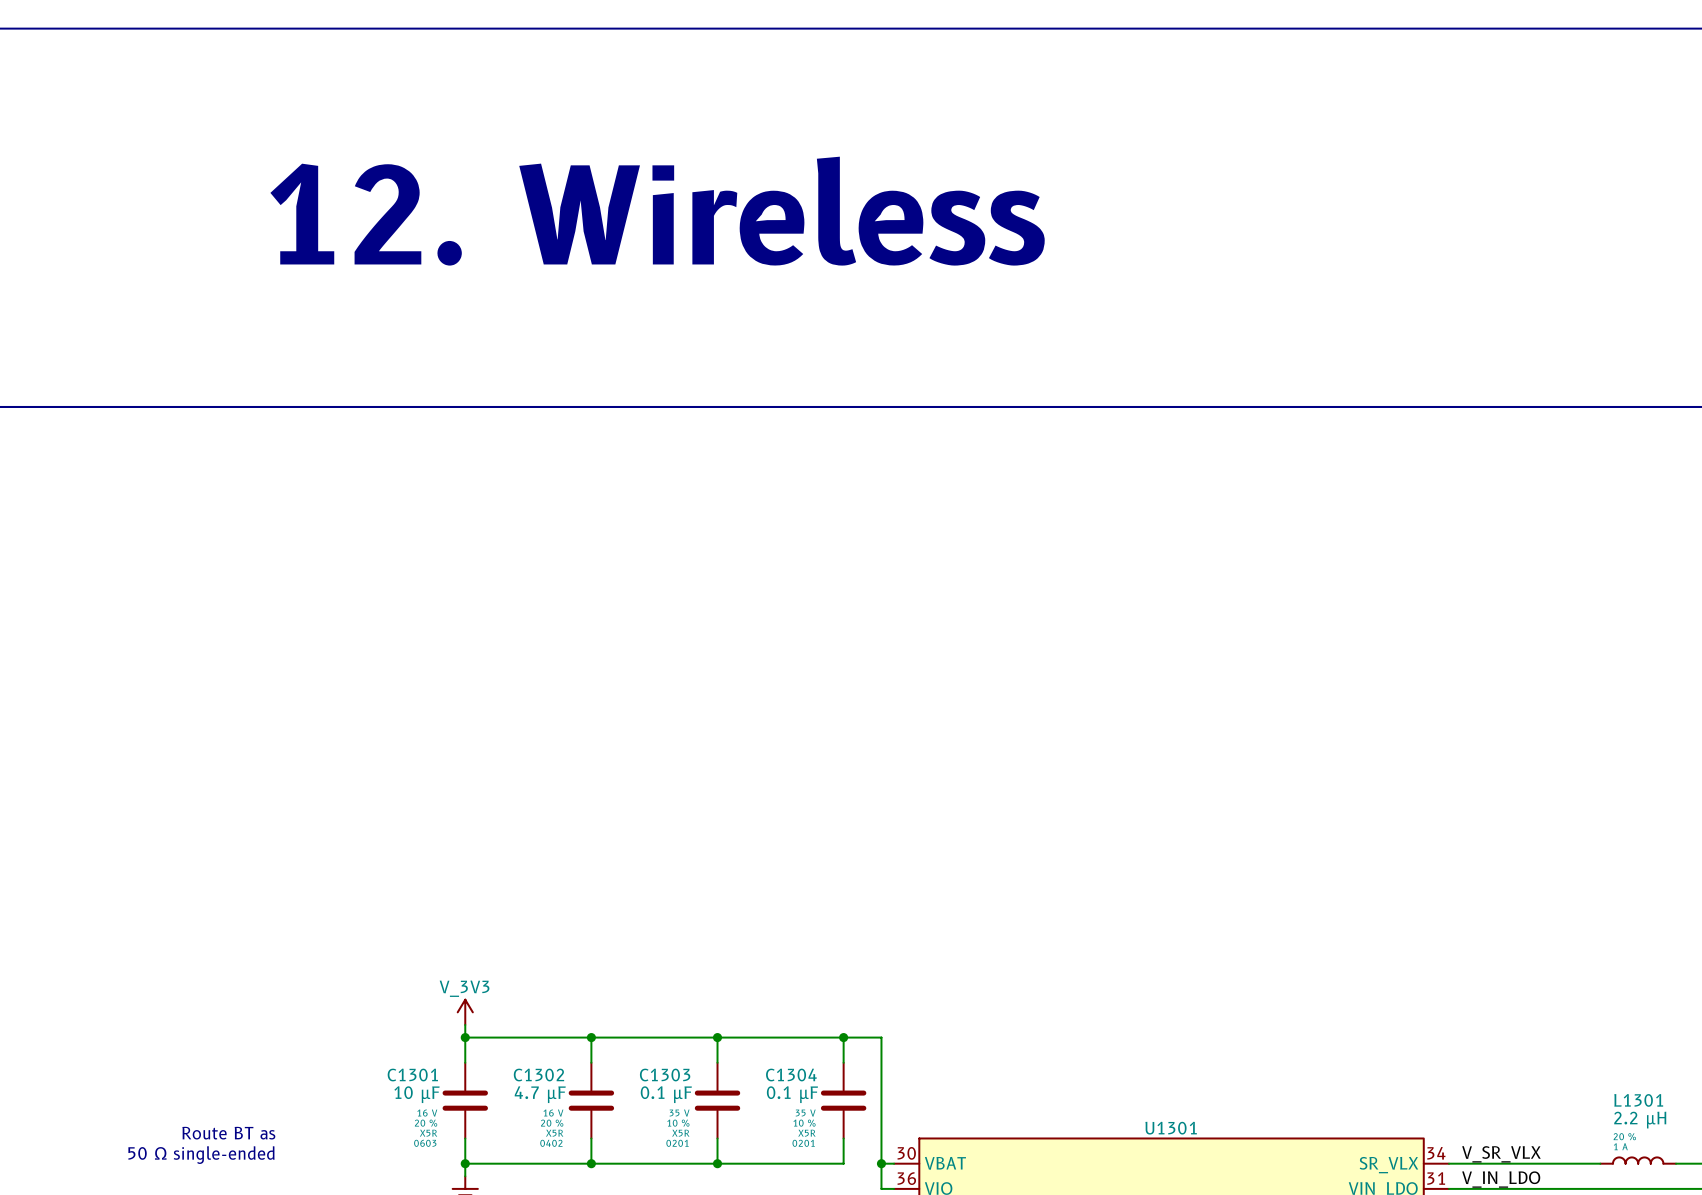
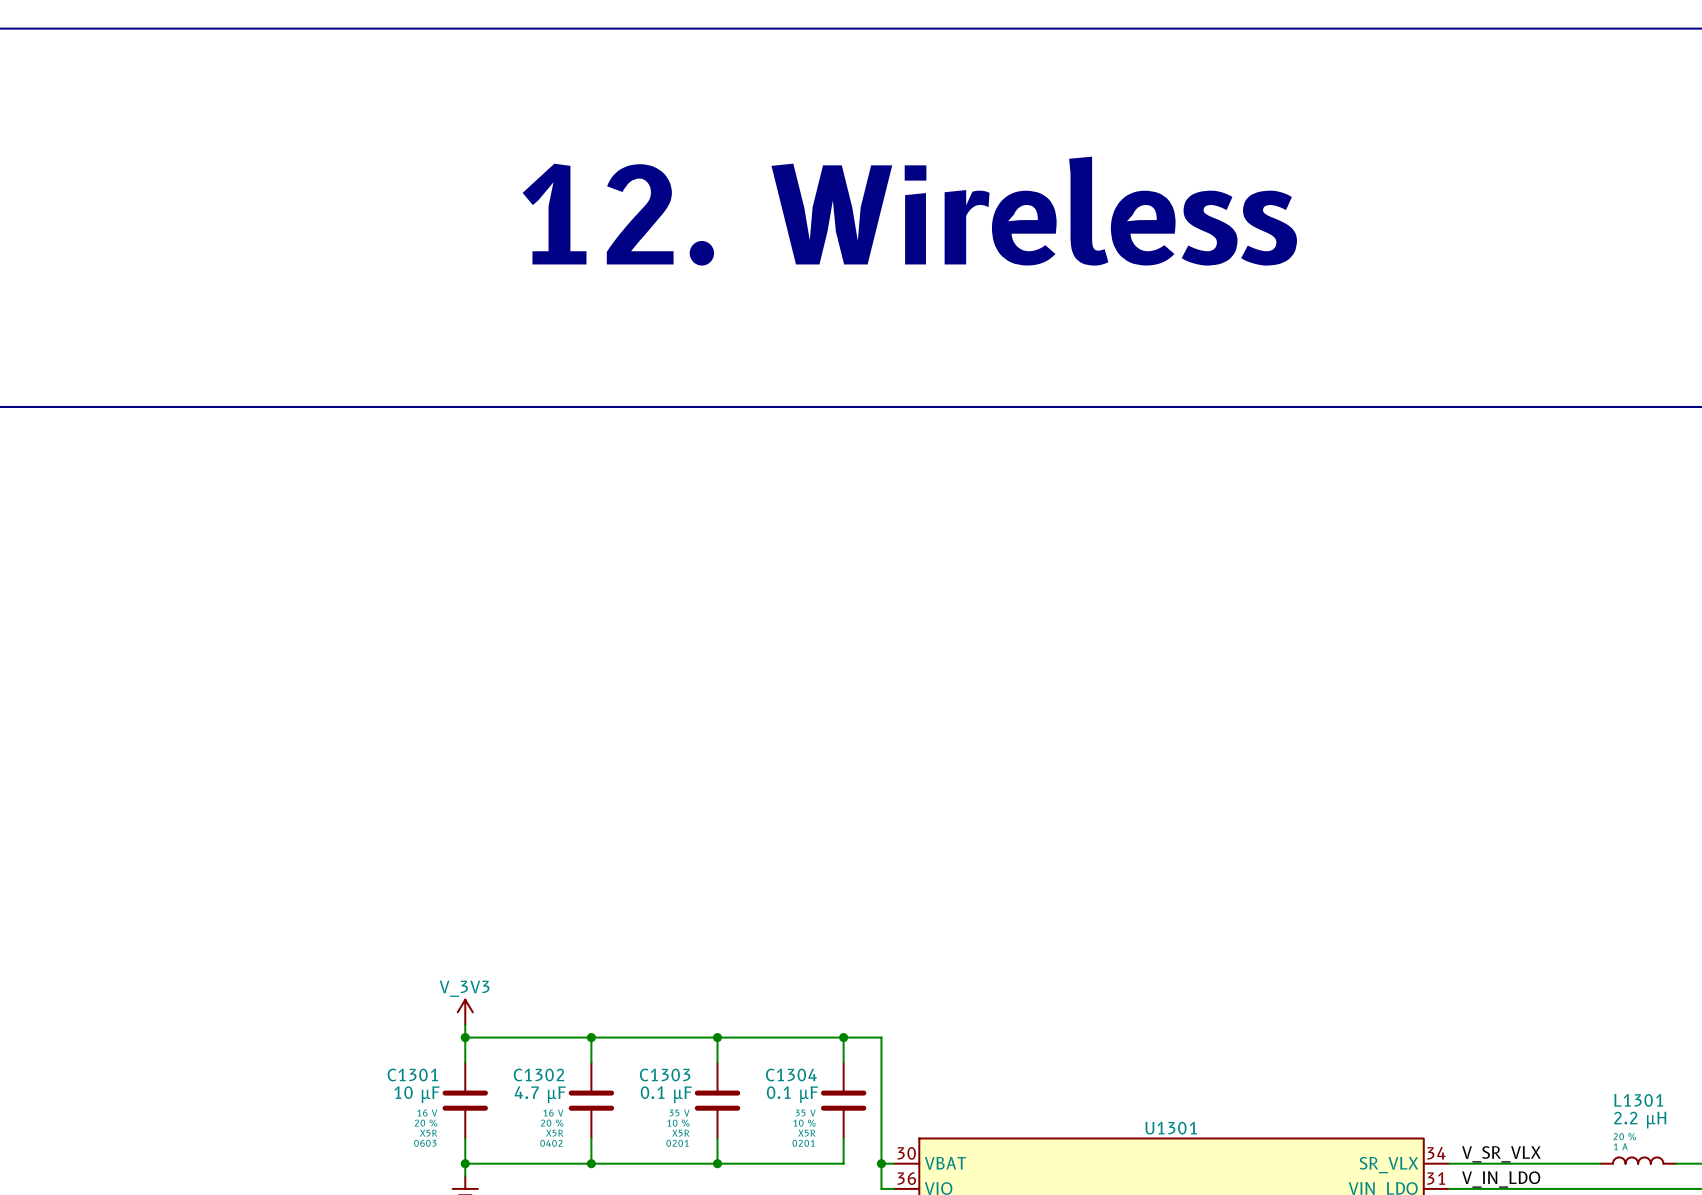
text: 12. Wireless (657, 211) -> none
text: none -> 12. Wireless (909, 211)
text: Route BT as (228, 1133) -> none
text: 50 Ω single-ended (201, 1155) -> none

